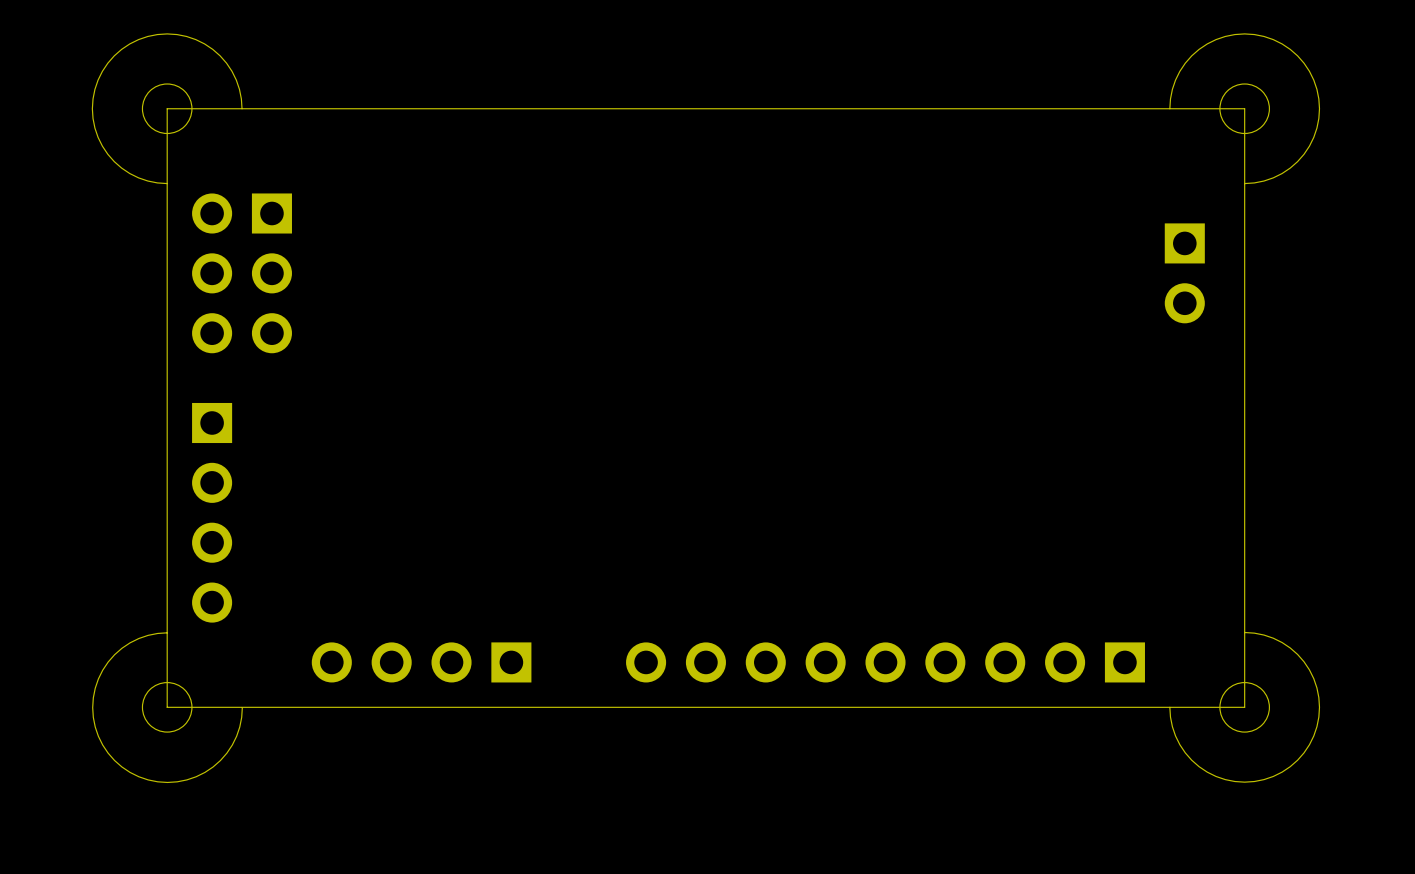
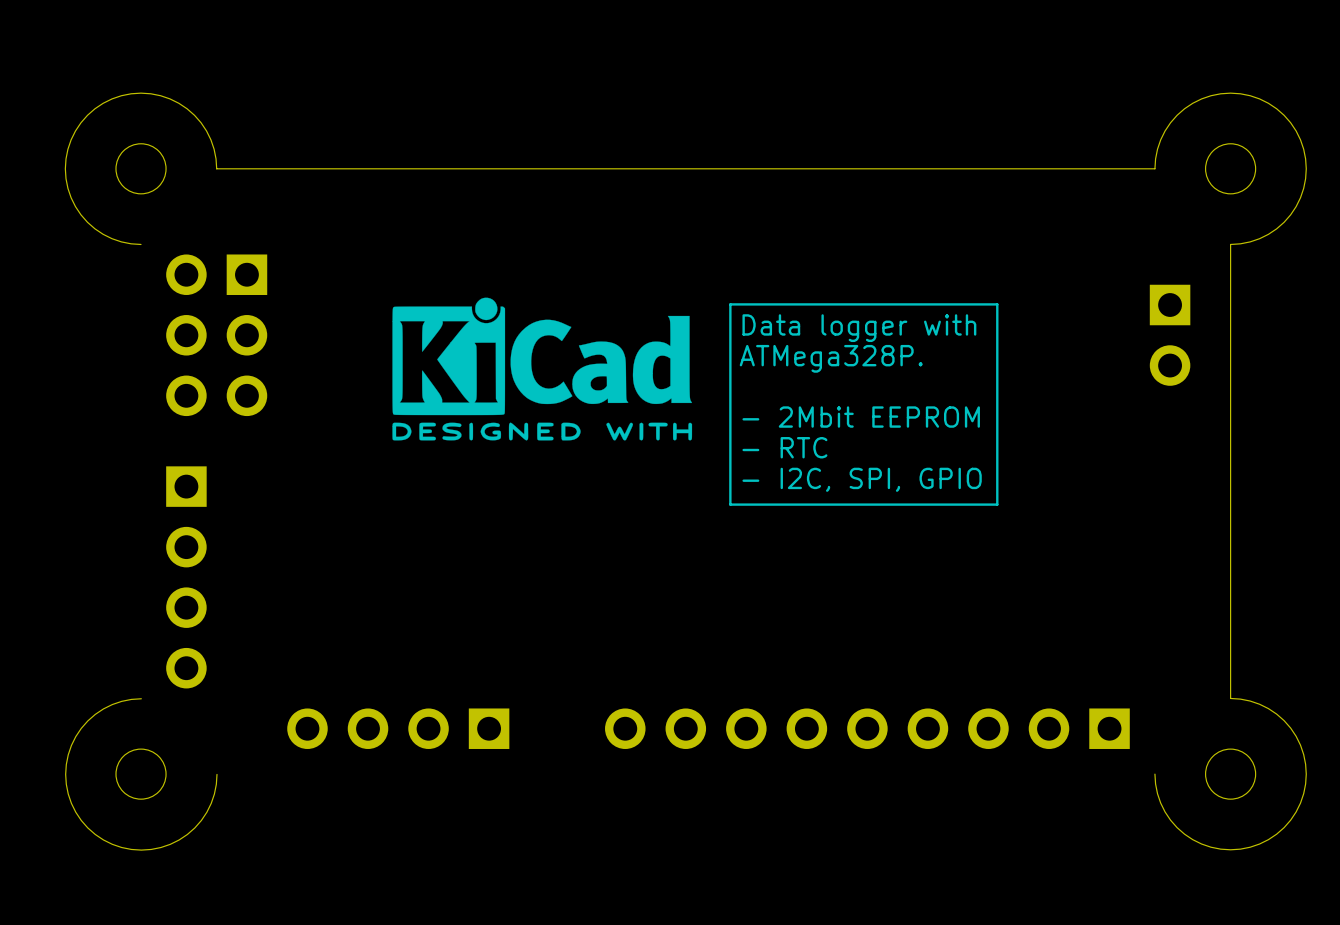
board edge: (242, 108) (167, 108) (167, 707) (1244, 707) (1244, 632) -> none
board edge: (1169, 108) (1244, 108) (1244, 183) -> none
drawing: none -> [392, 297, 693, 441]
line: none -> (997, 304) (730, 304) (730, 504) (997, 504) (997, 304)
text: none -> Data logger with (859, 328)
text: none -> ATMega328P. (831, 358)
text: none -> - 2Mbit EEPROM (861, 417)
text: none -> - RTC (784, 447)
text: none -> - I2C, SPI, GPIO (862, 479)

